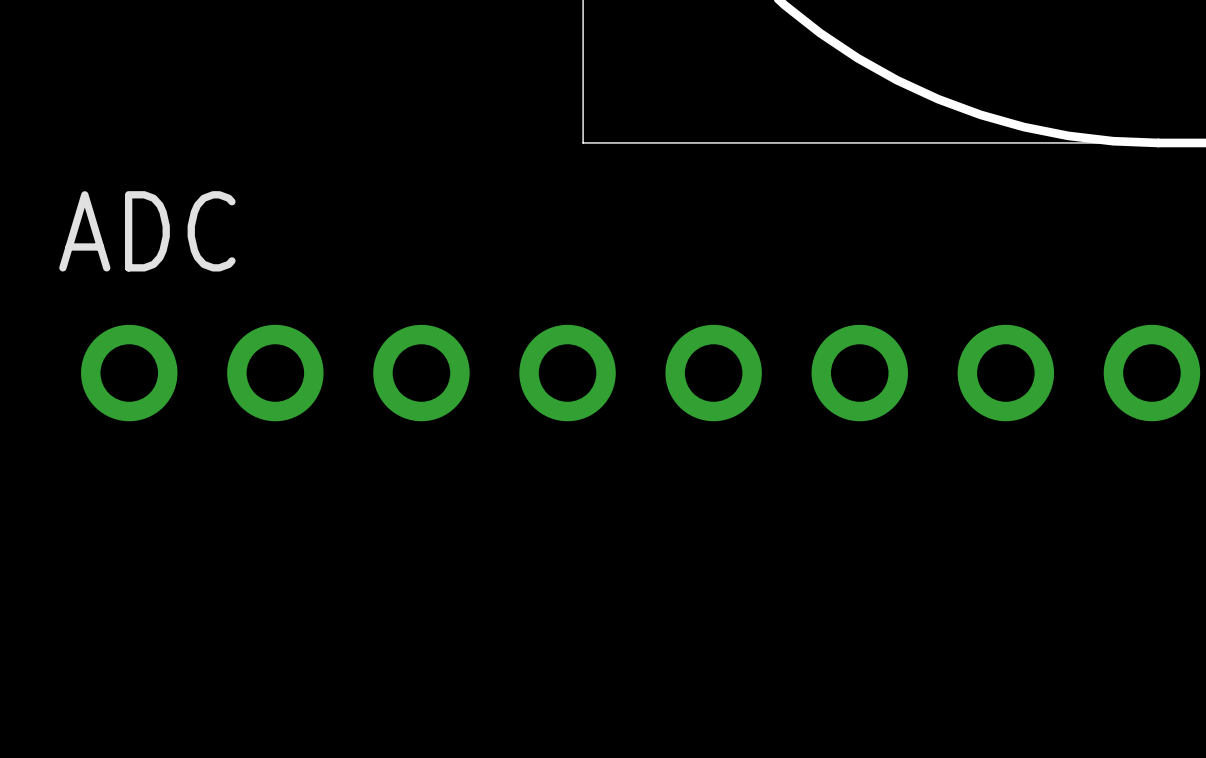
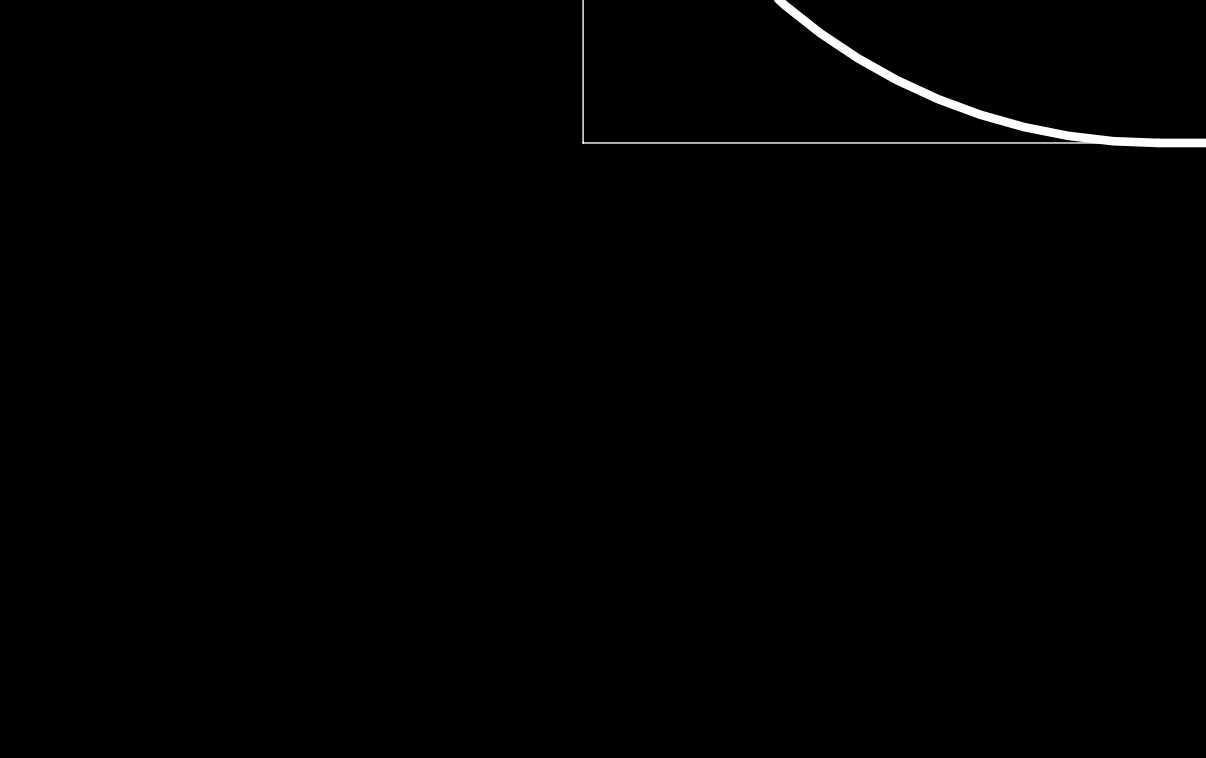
ADC: (640, 373) -> none

